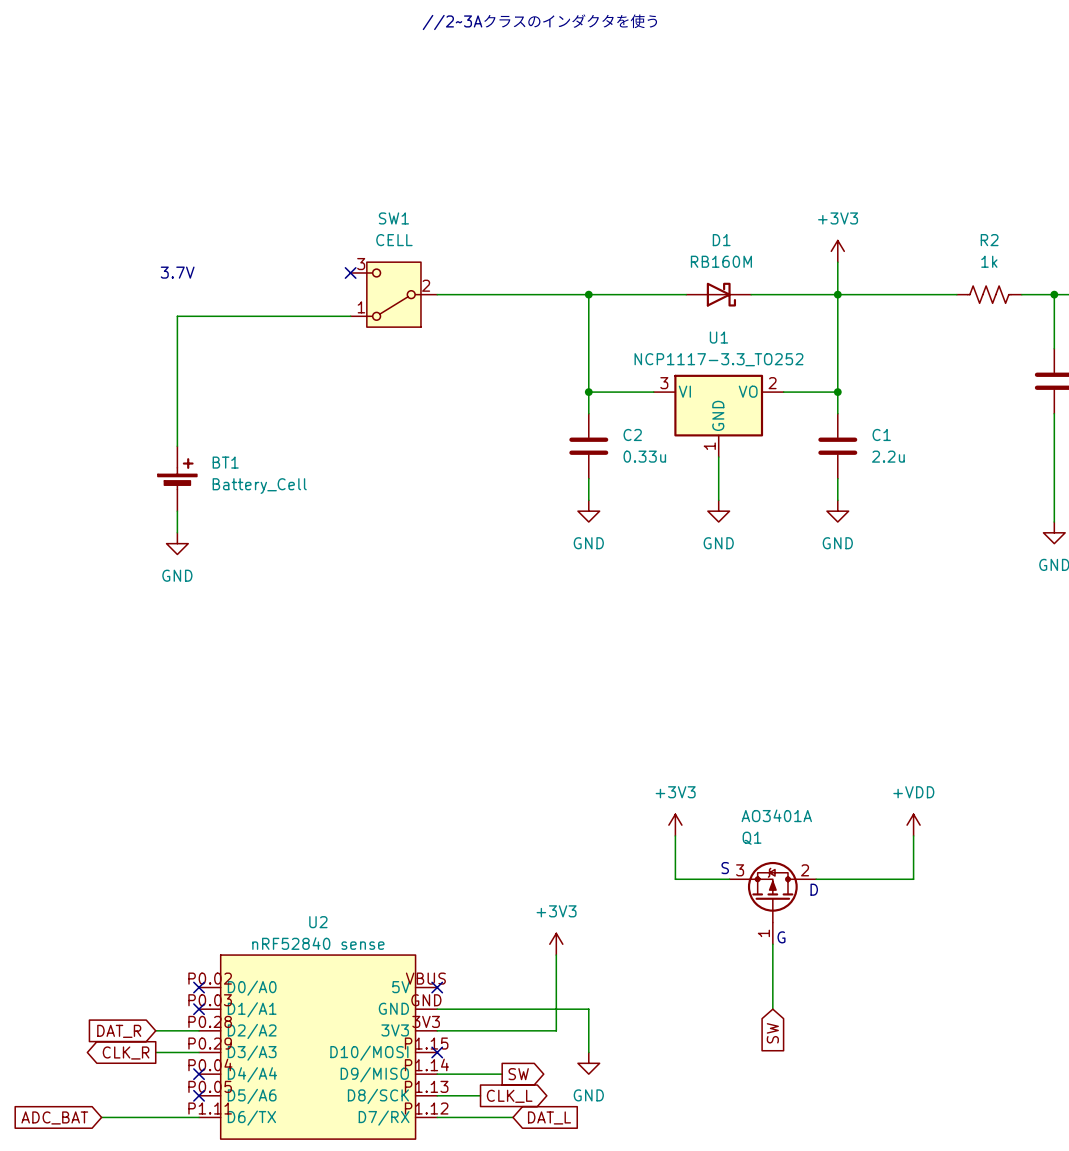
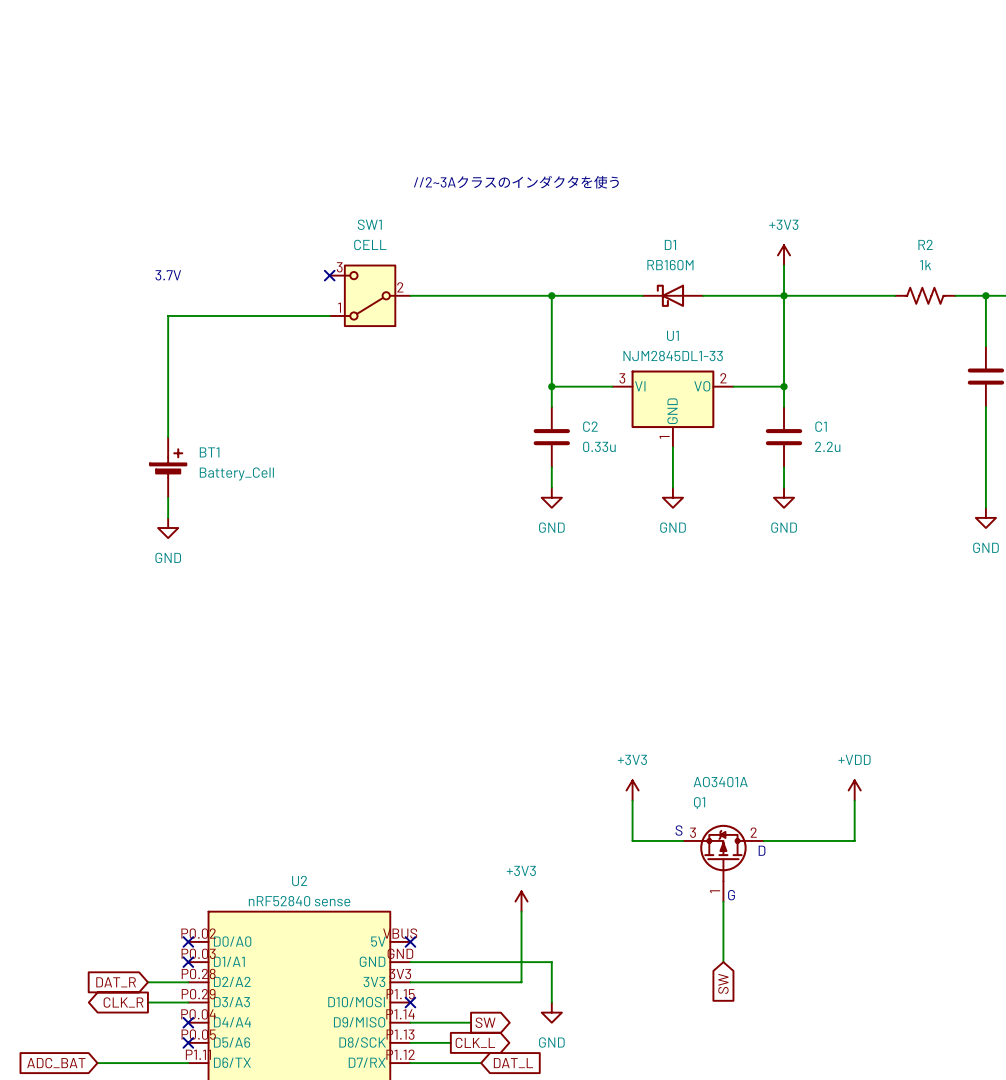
text position: //2~3Aクラスのインダクタを使う (540, 21) -> //2~3Aクラスのインダクタを使う (516, 182)
D1 rotation: 0° (721, 294) -> 180° (670, 295)
U1 value: NCP1117-3.3_TO252 (718, 359) -> NJM2845DL1-33 (673, 355)

